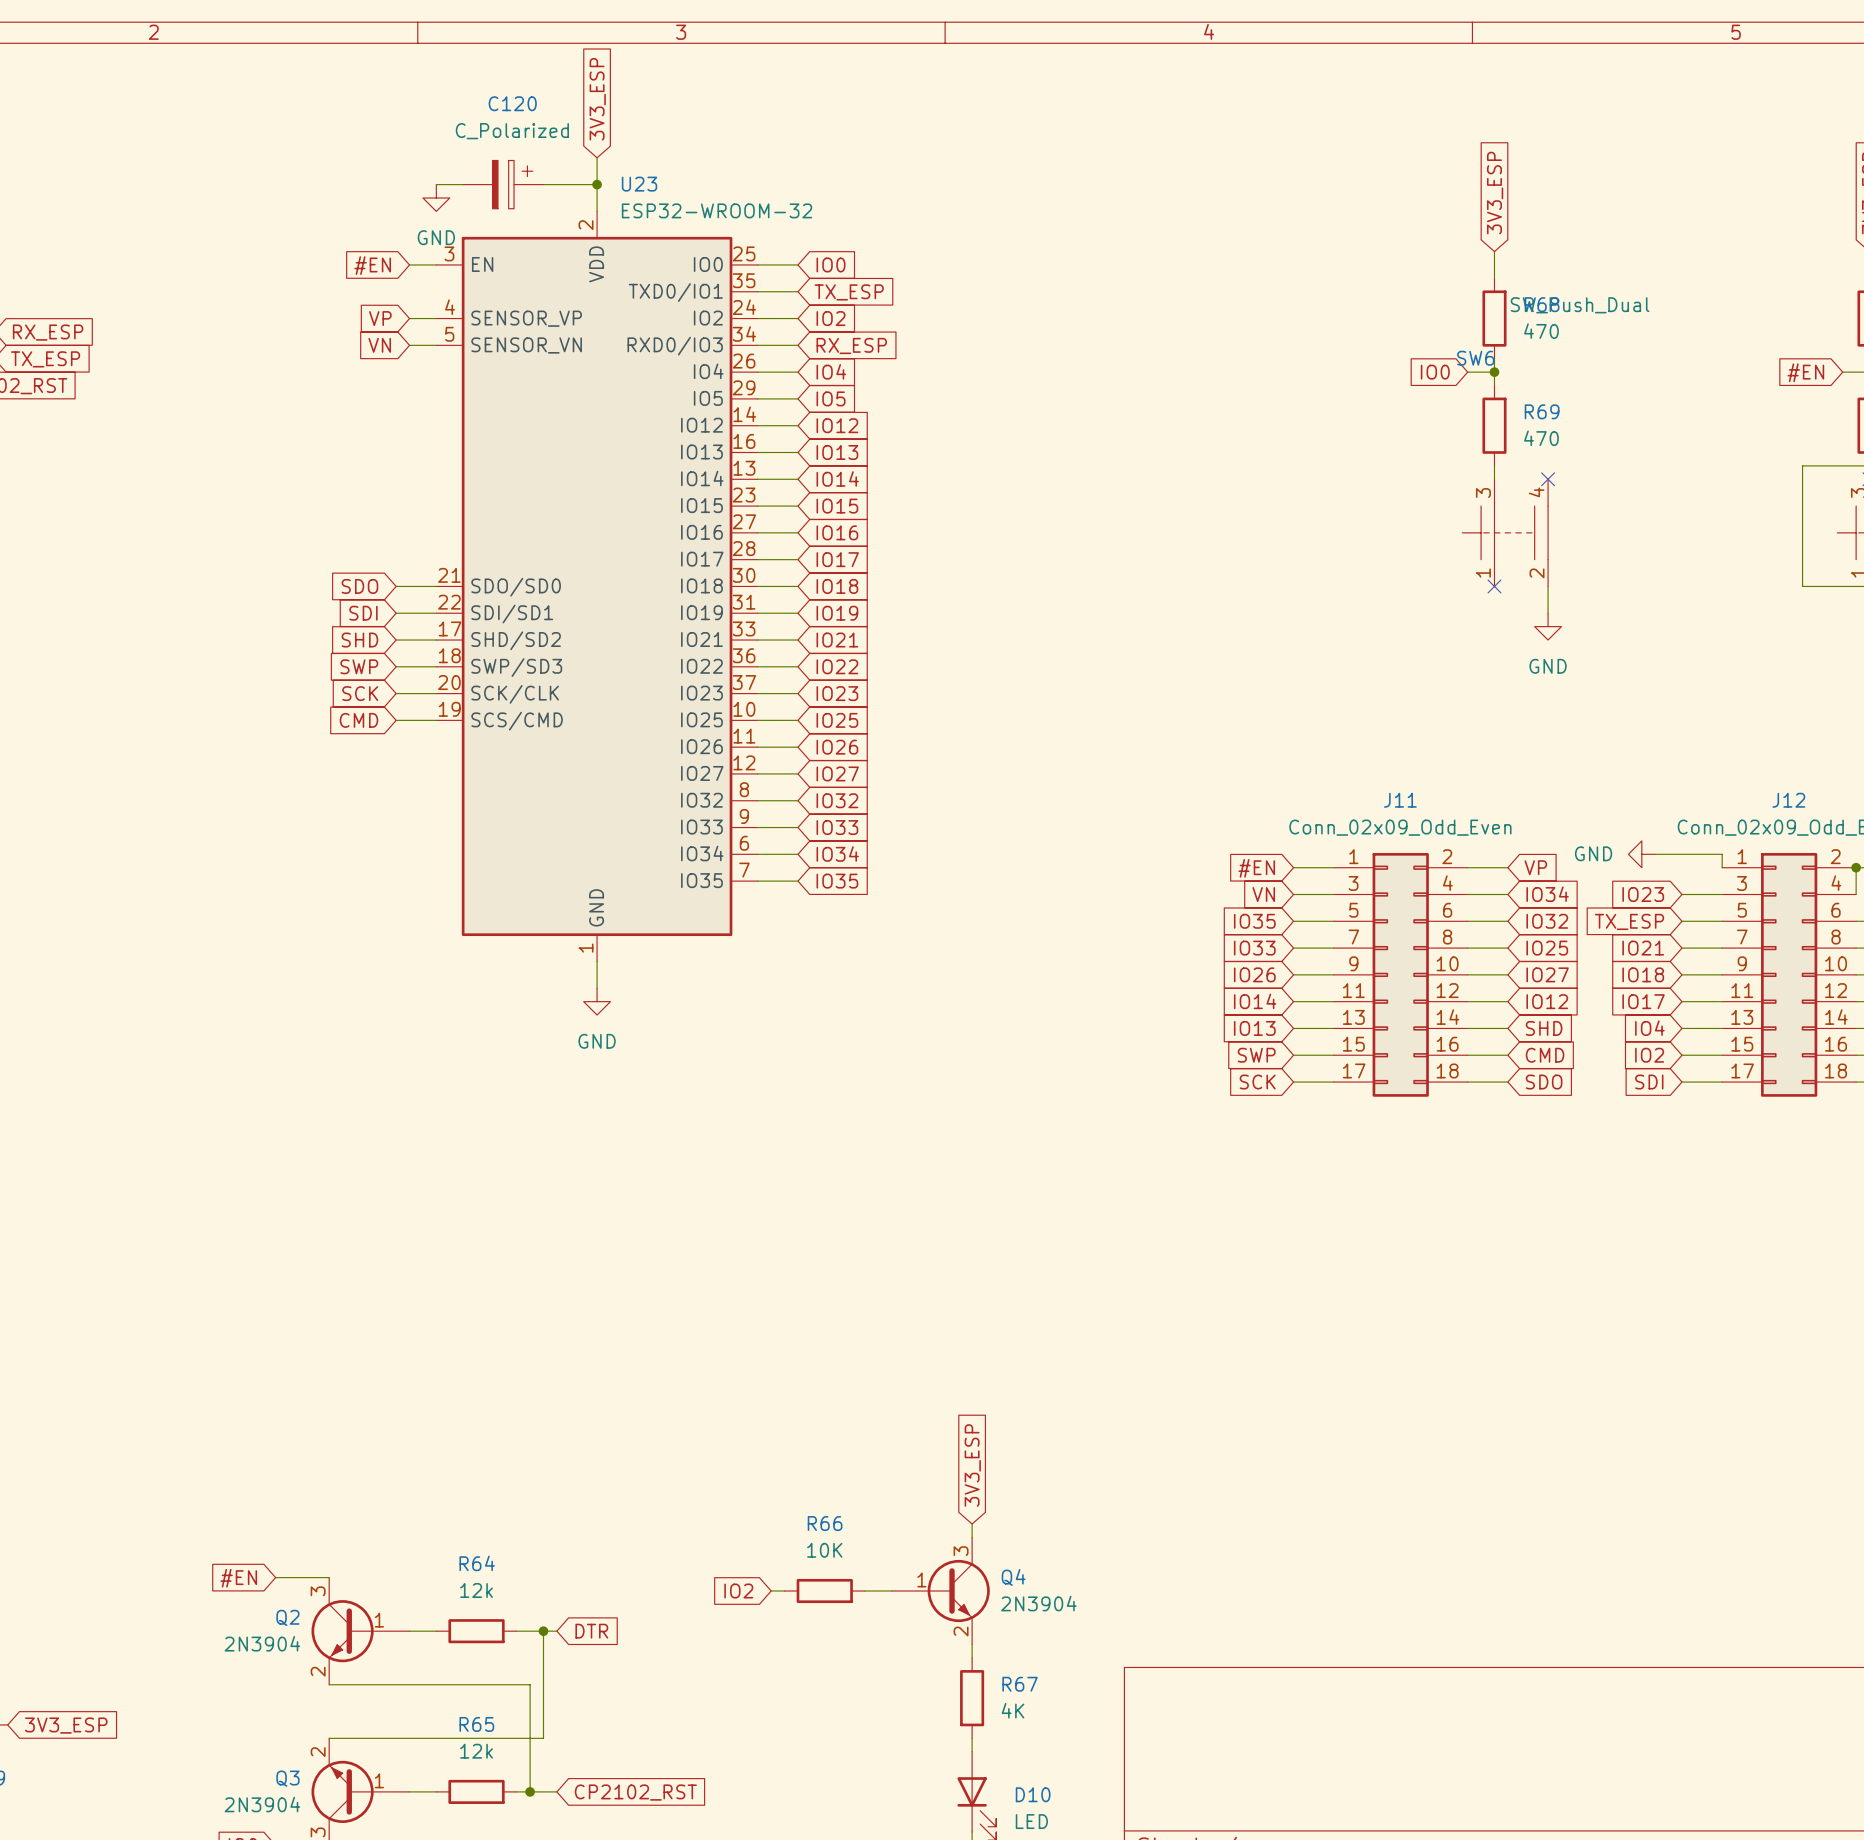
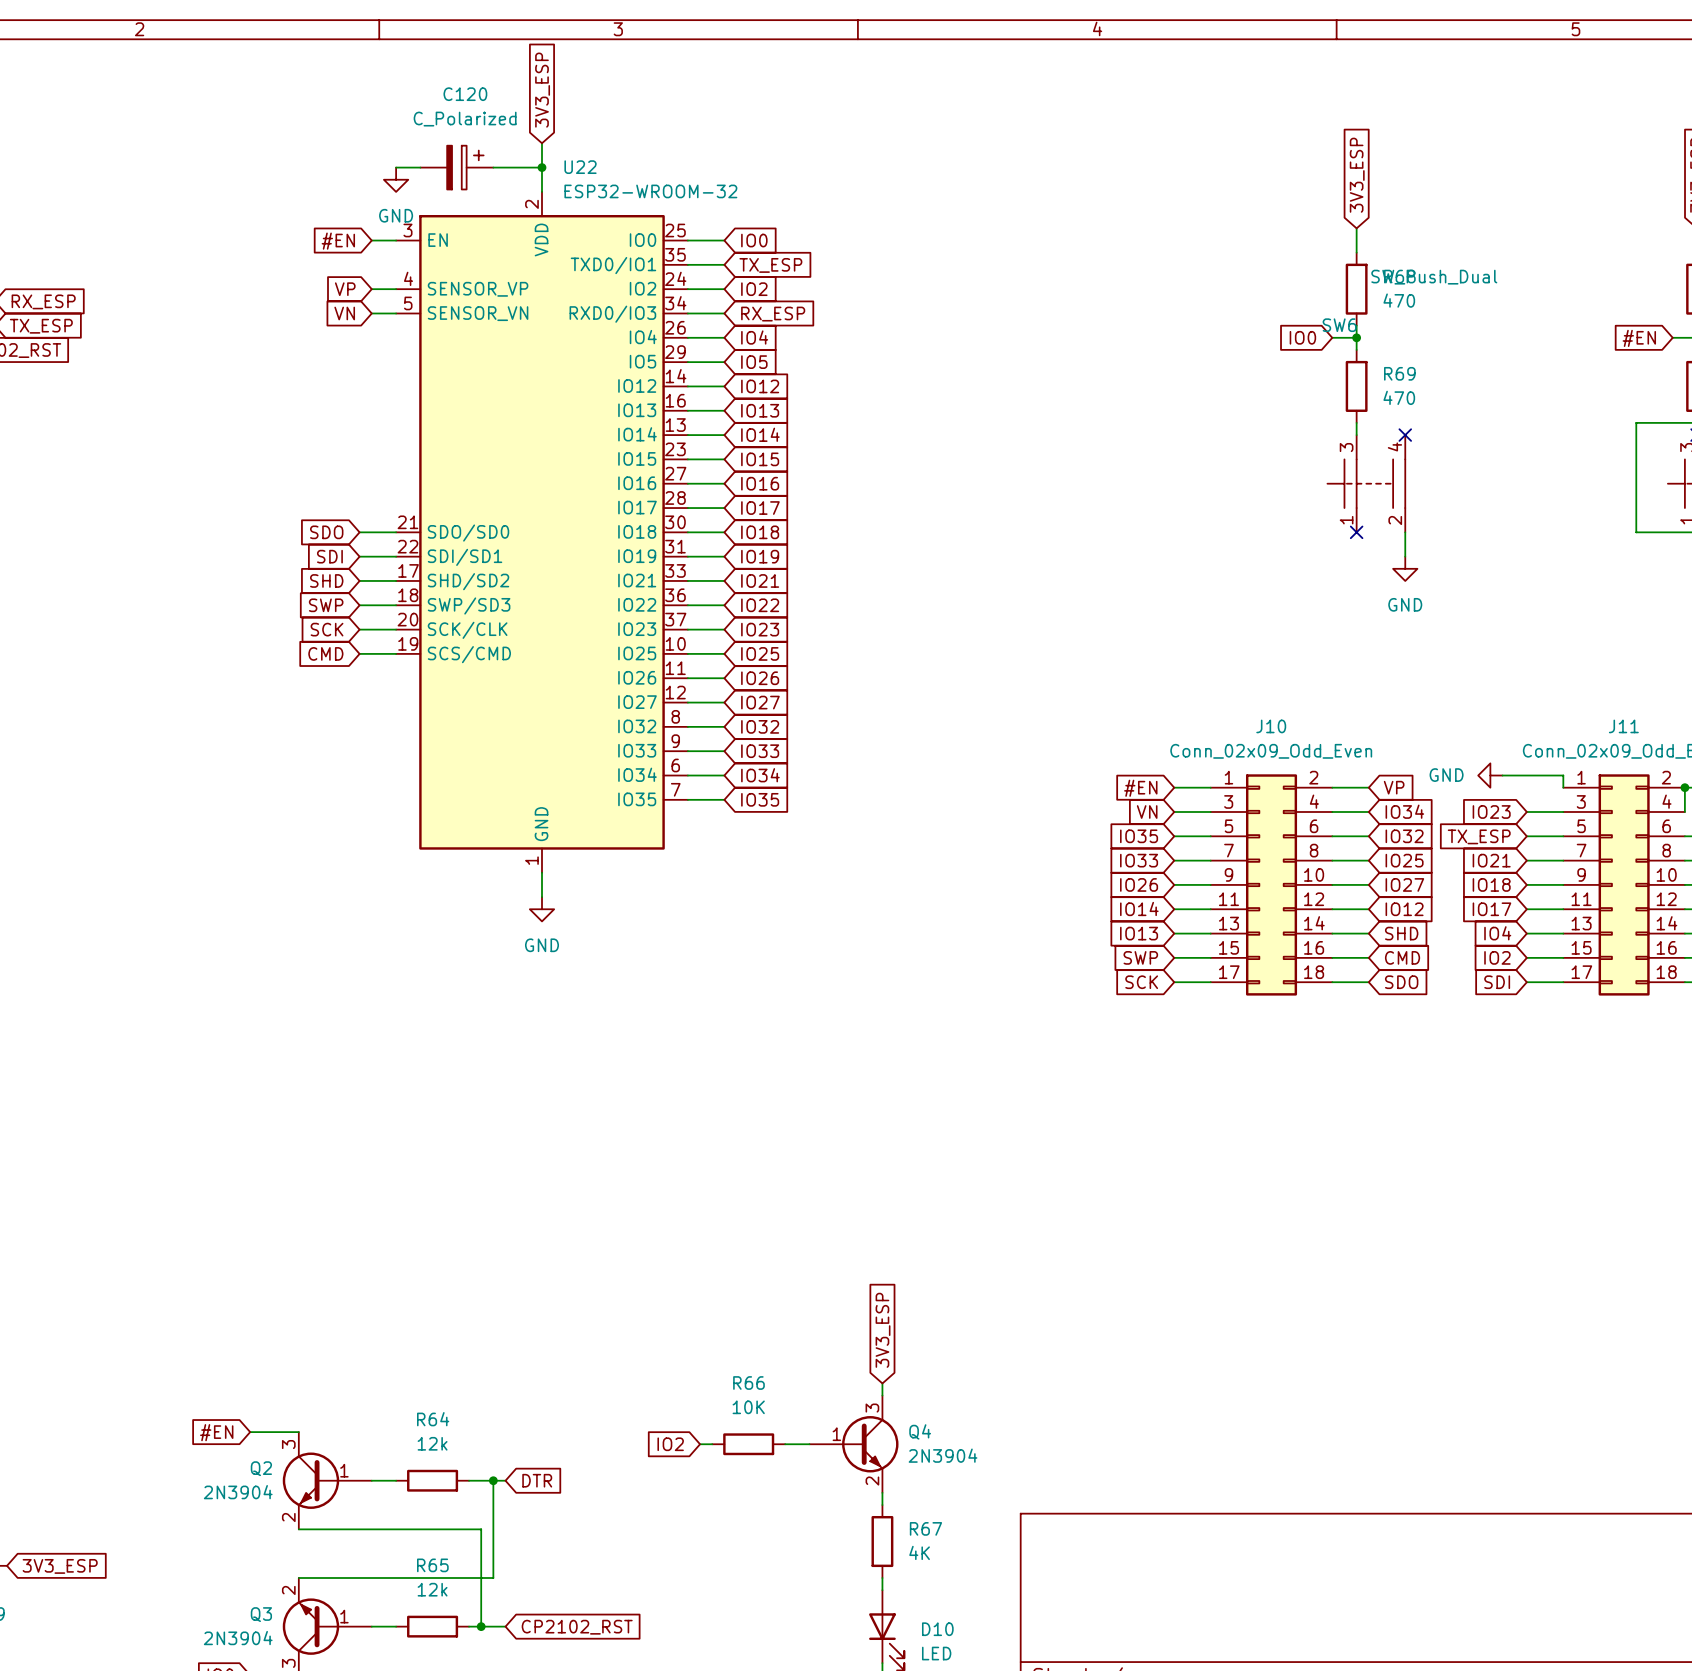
U23 name: U23 (639, 184) -> U22 (580, 167)
J11 name: J11 (1400, 800) -> J10 (1271, 726)
J12 name: J12 (1788, 800) -> J11 (1623, 726)

